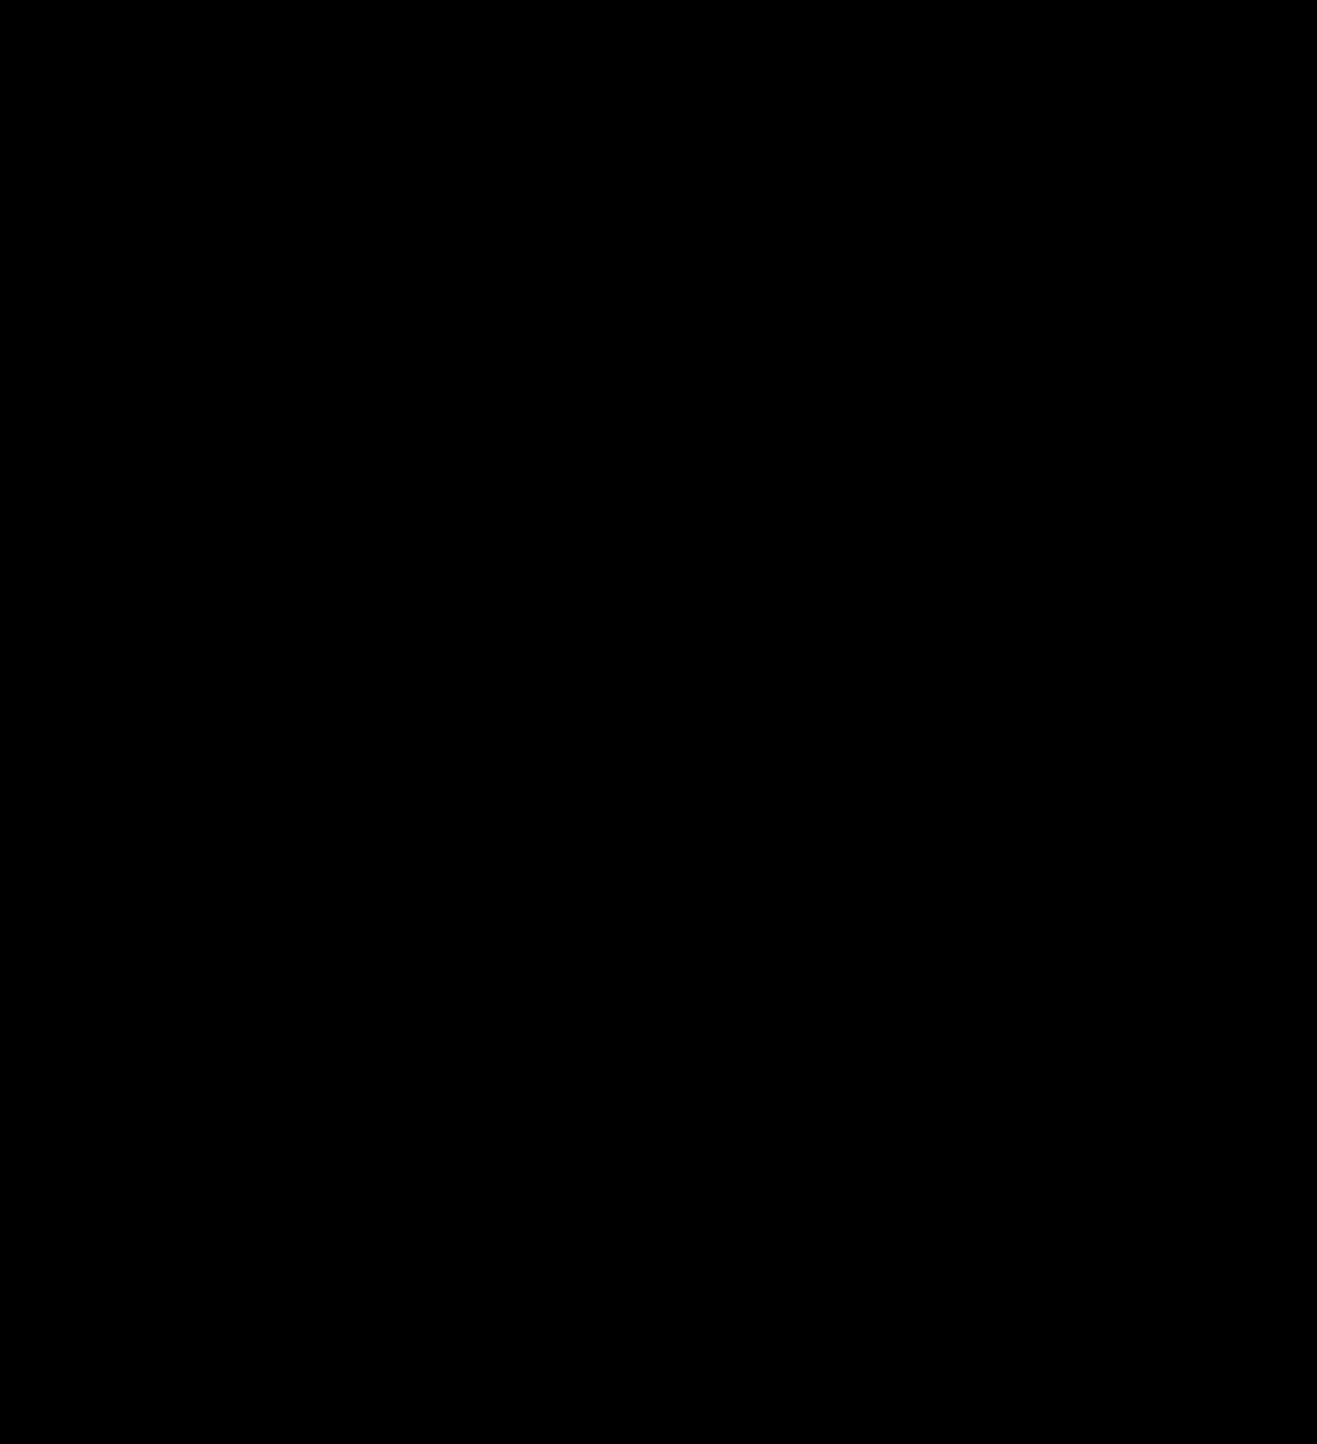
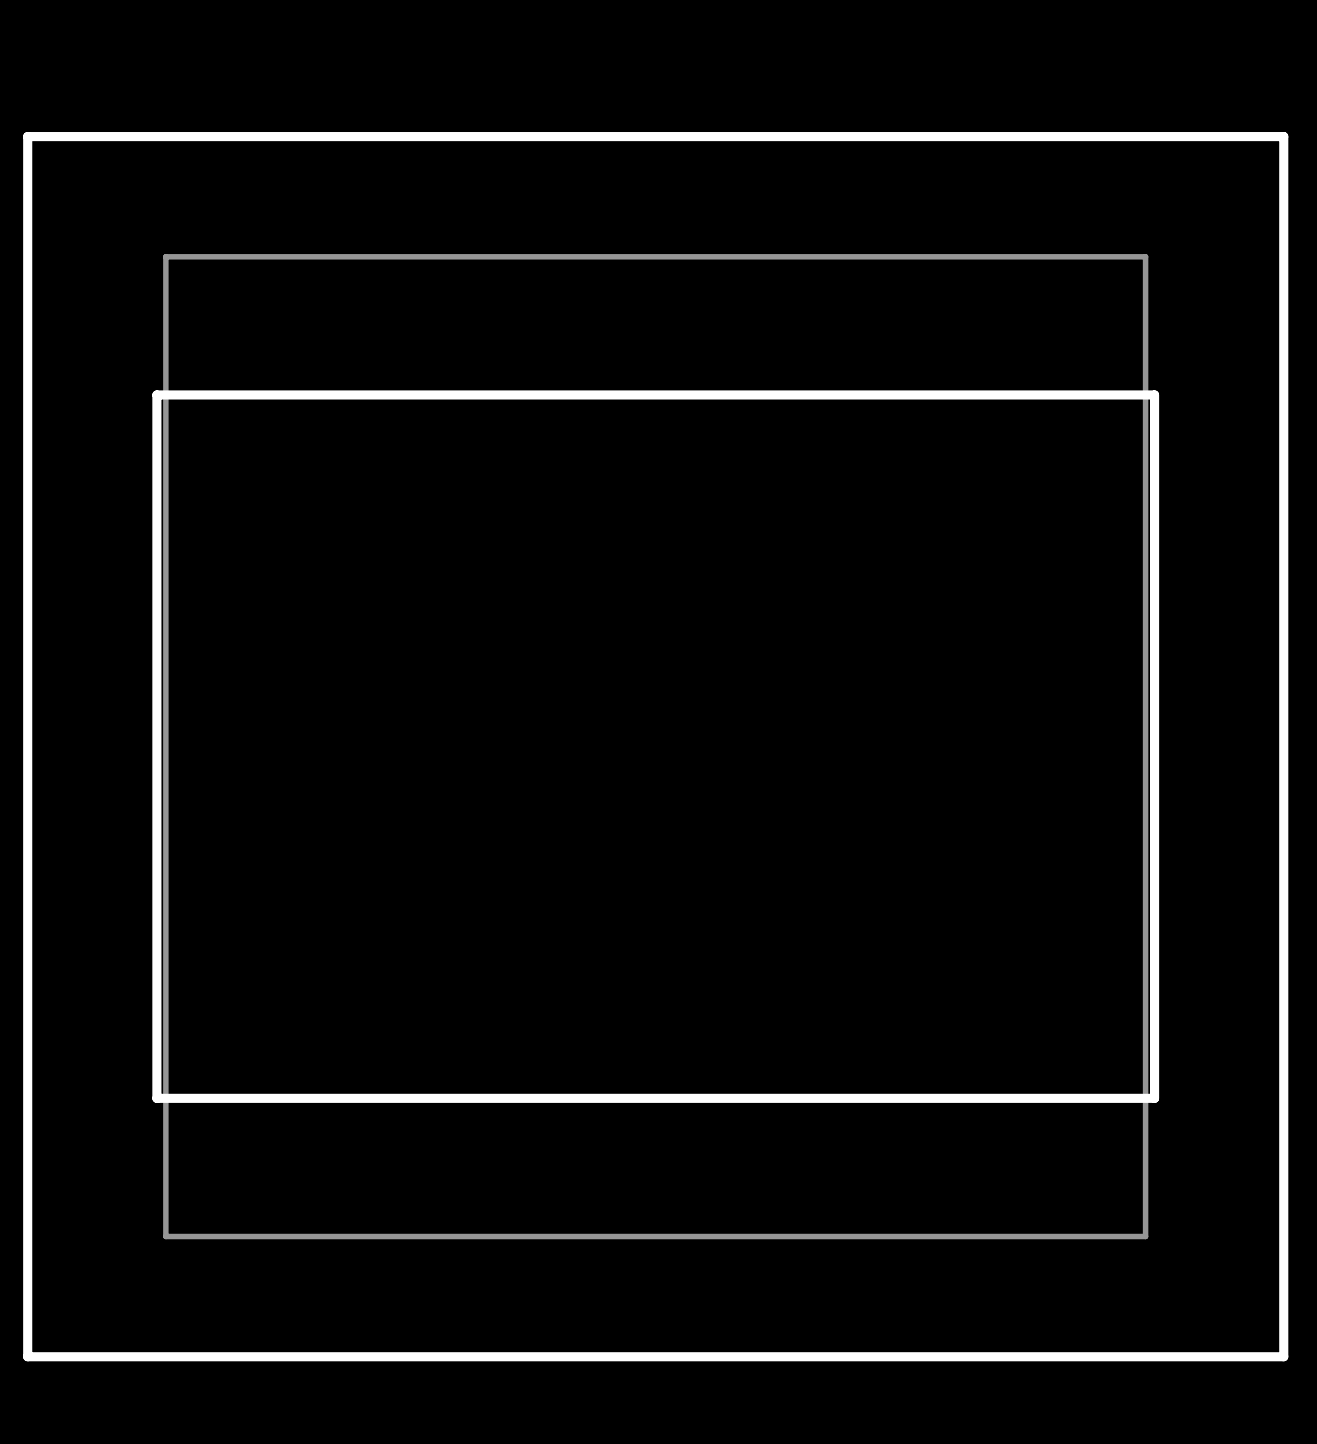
board edge: none -> (27, 136) (1283, 136) (1283, 1356) (27, 1356) (27, 136)
line: none -> (165, 256) (165, 1236) (1145, 1236) (1145, 256) (165, 256)
board edge: none -> (156, 394) (156, 1098) (1154, 1098) (1154, 394) (156, 394)

